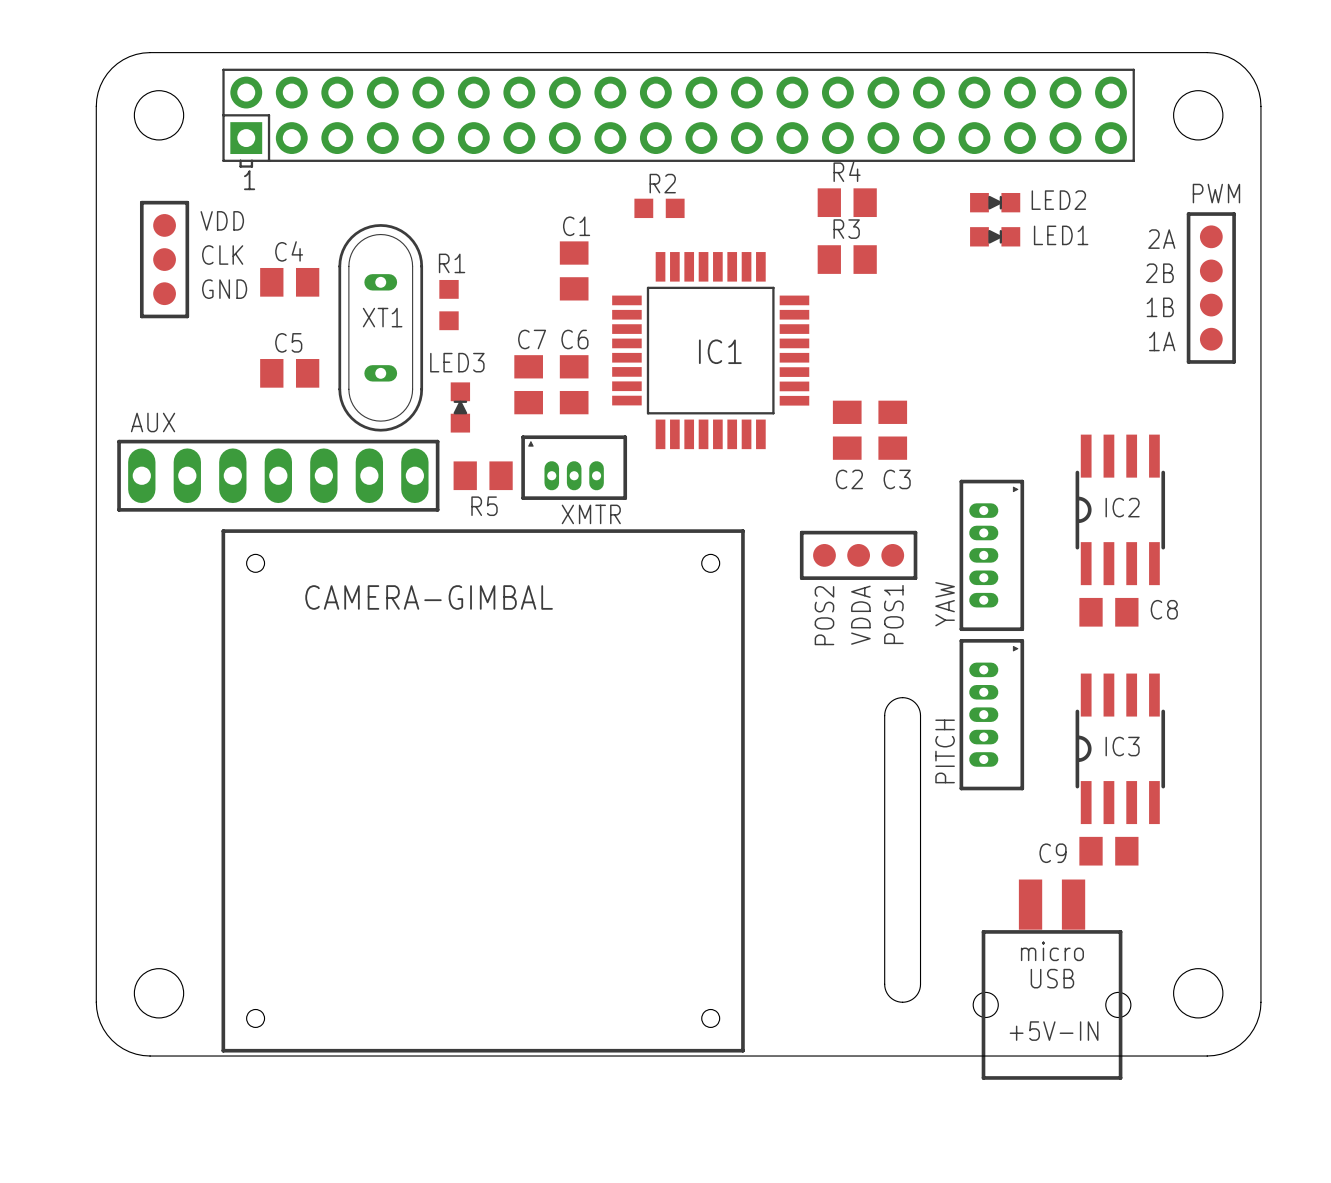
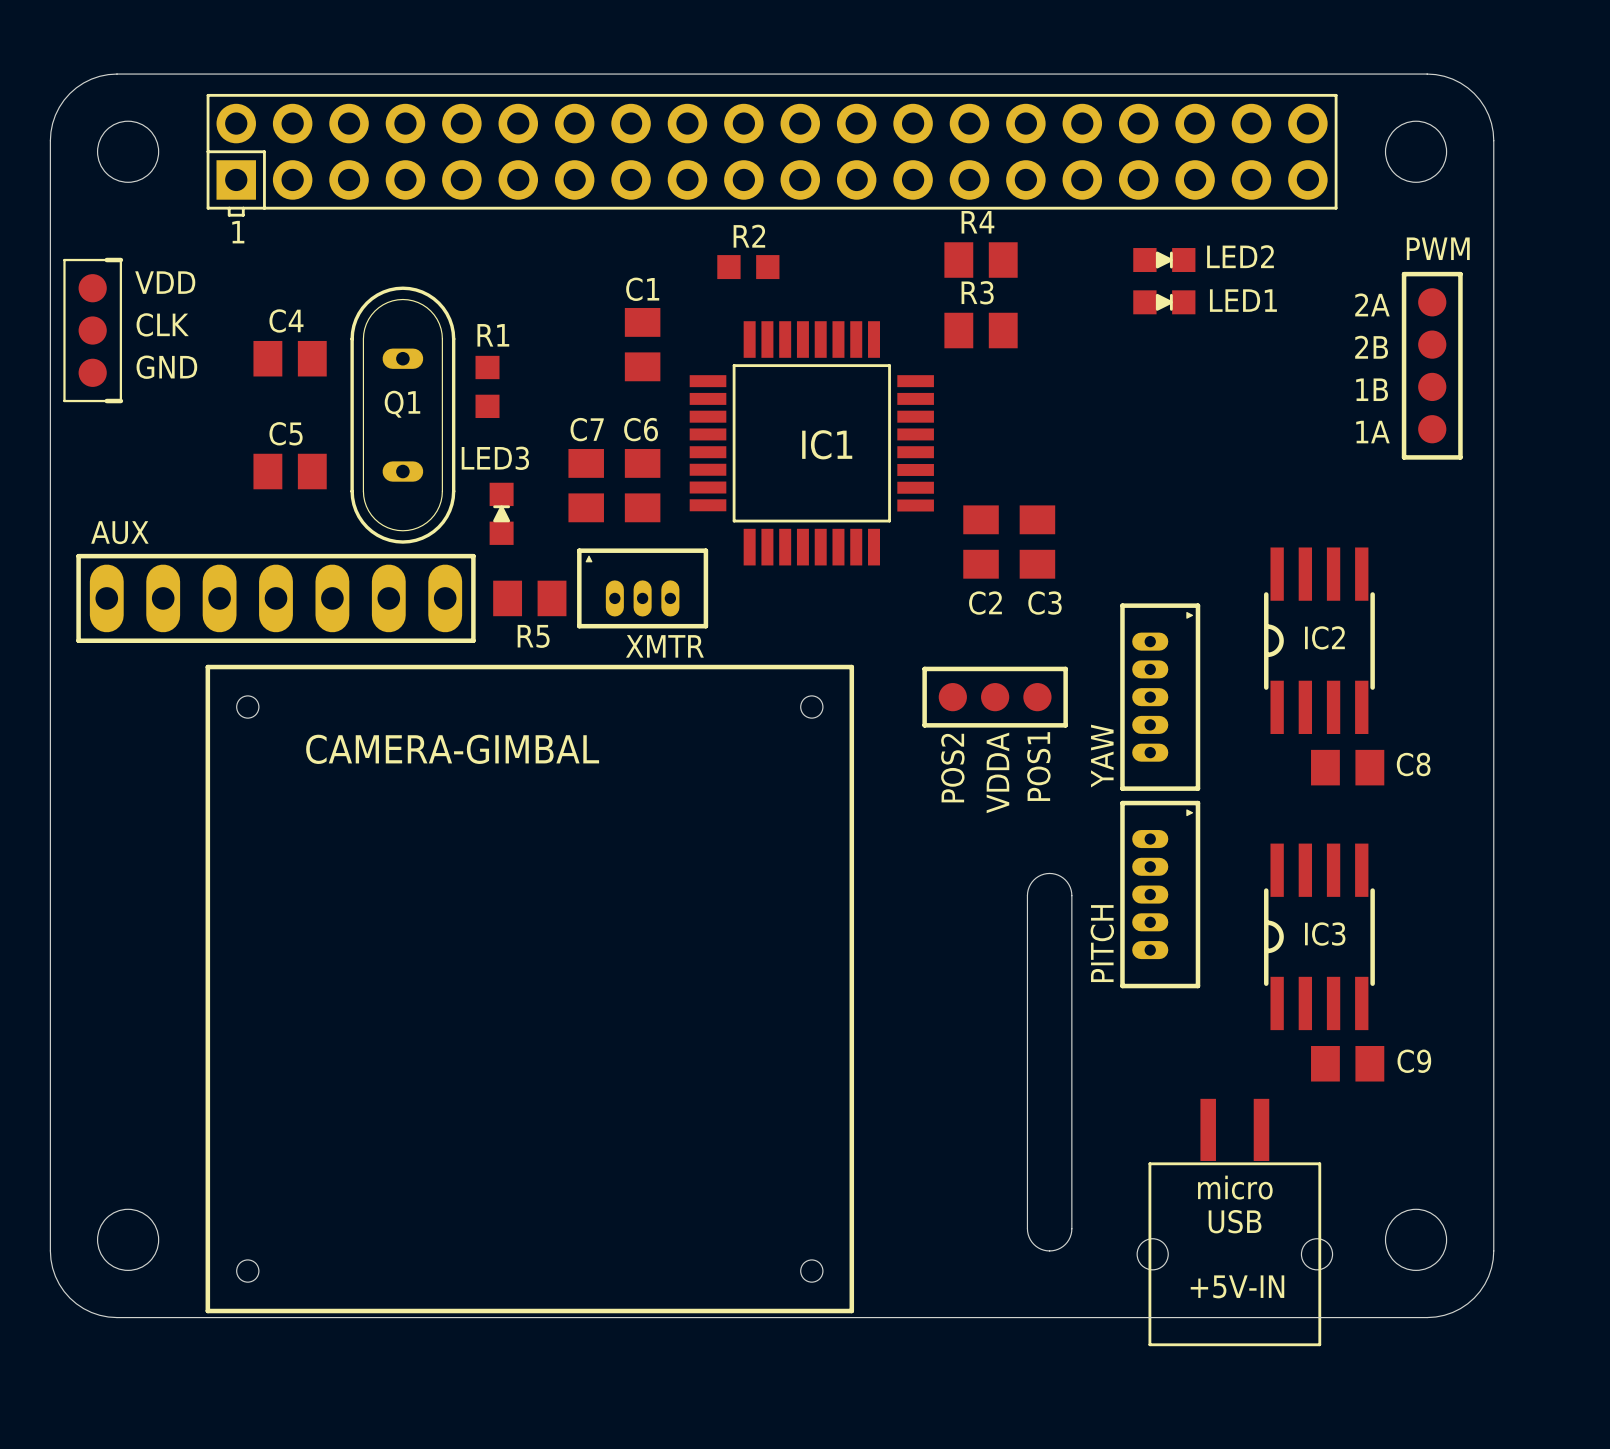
line: (141, 202) (141, 316) -> (106, 260) (64, 260) (64, 401) (106, 401)
line: (153, 202) (187, 202) (187, 316) (153, 316) -> (120, 260) (120, 401)
VDD position: (164, 225) -> (92, 288)
CLK position: (164, 259) -> (92, 330)
GND position: (164, 293) -> (92, 372)
XT1 name: XT1 (382, 317) -> Q1 (402, 404)
C8 position: (1108, 612) -> (1347, 767)
C9 position: (1108, 851) -> (1347, 1063)
C9 name position: C9 (1053, 853) -> C9 (1414, 1061)
+5V-IN footprint: [973, 879, 1131, 1080] -> [1137, 1098, 1333, 1347]

